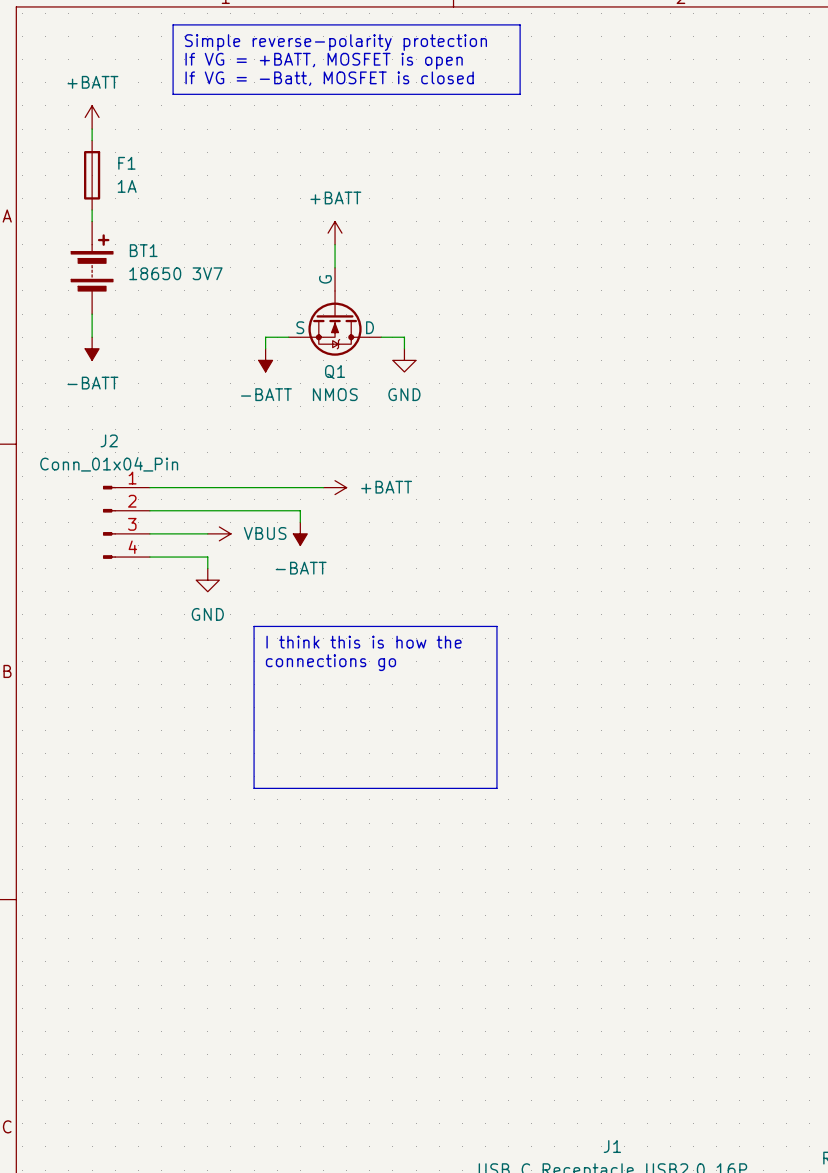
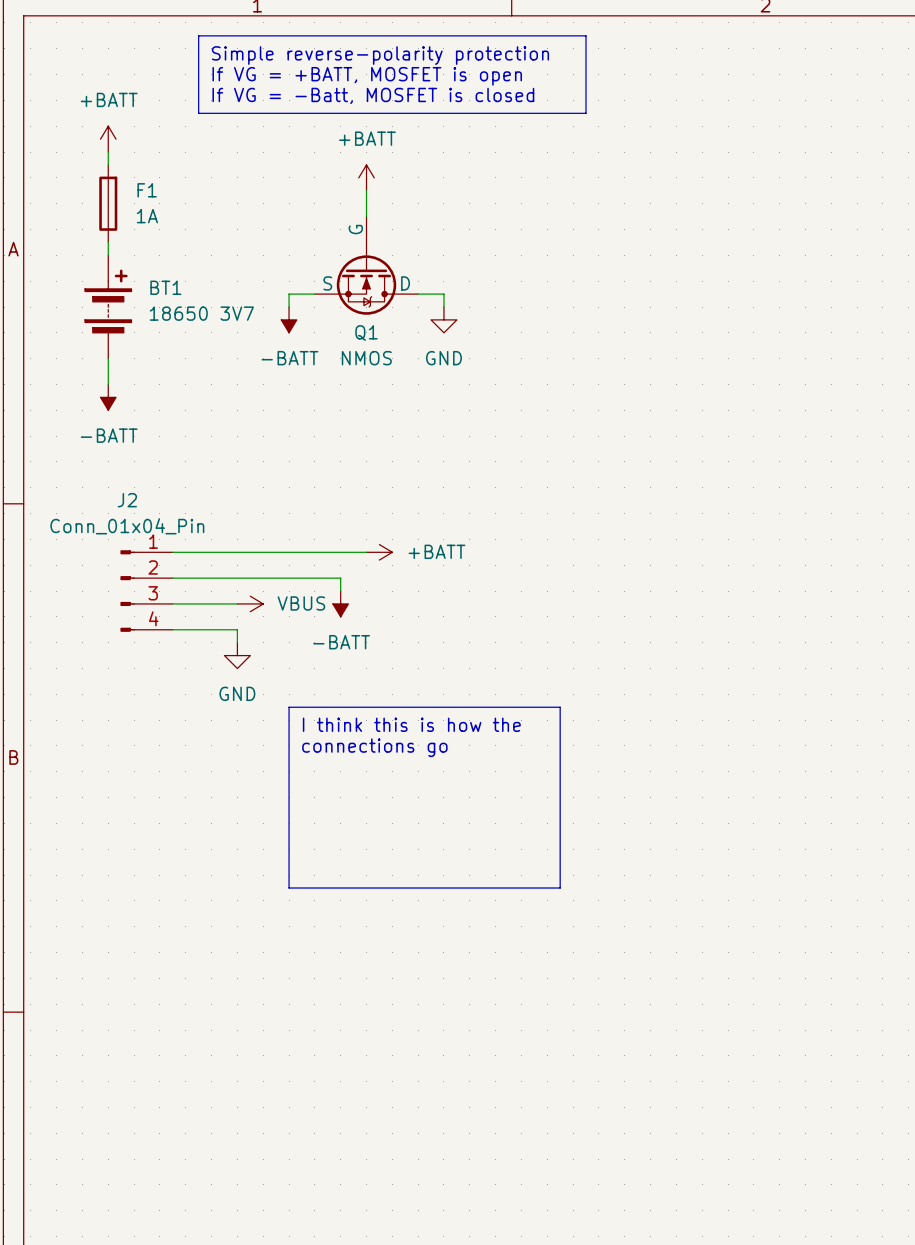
power symbol position: +BATT (335, 233) -> +BATT (366, 177)
wire: (335, 244) (335, 267) -> (366, 190) (366, 216)
Q1 position: (335, 311) -> (366, 265)
wire: (288, 337) (265, 337) (265, 348) -> (314, 294) (289, 294) (289, 307)
wire: (381, 337) (404, 337) (404, 348) -> (418, 294) (443, 294) (443, 307)
power symbol position: -BATT (265, 360) -> -BATT (289, 319)
power symbol position: GND (404, 360) -> GND (443, 319)

